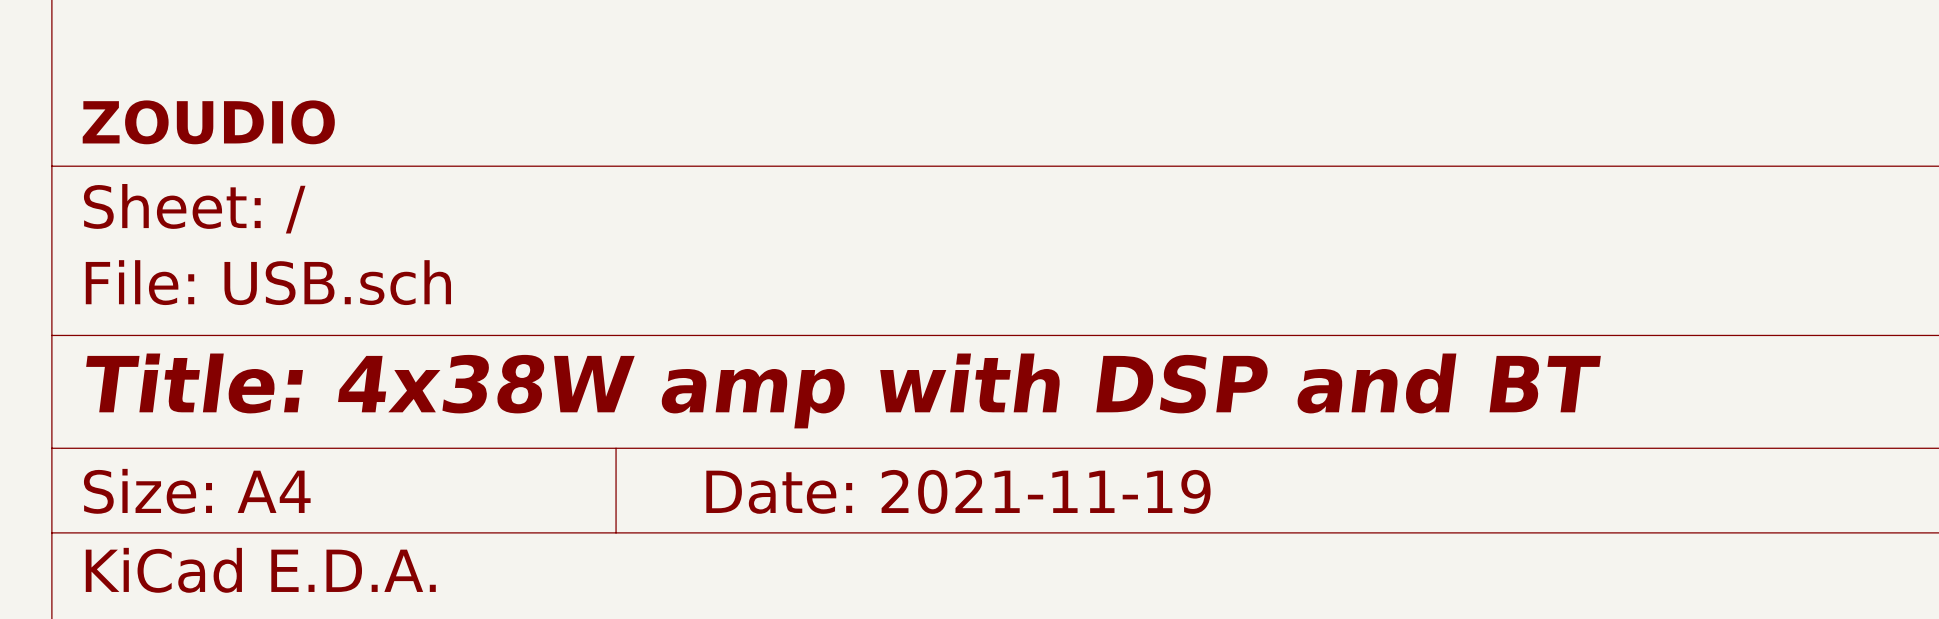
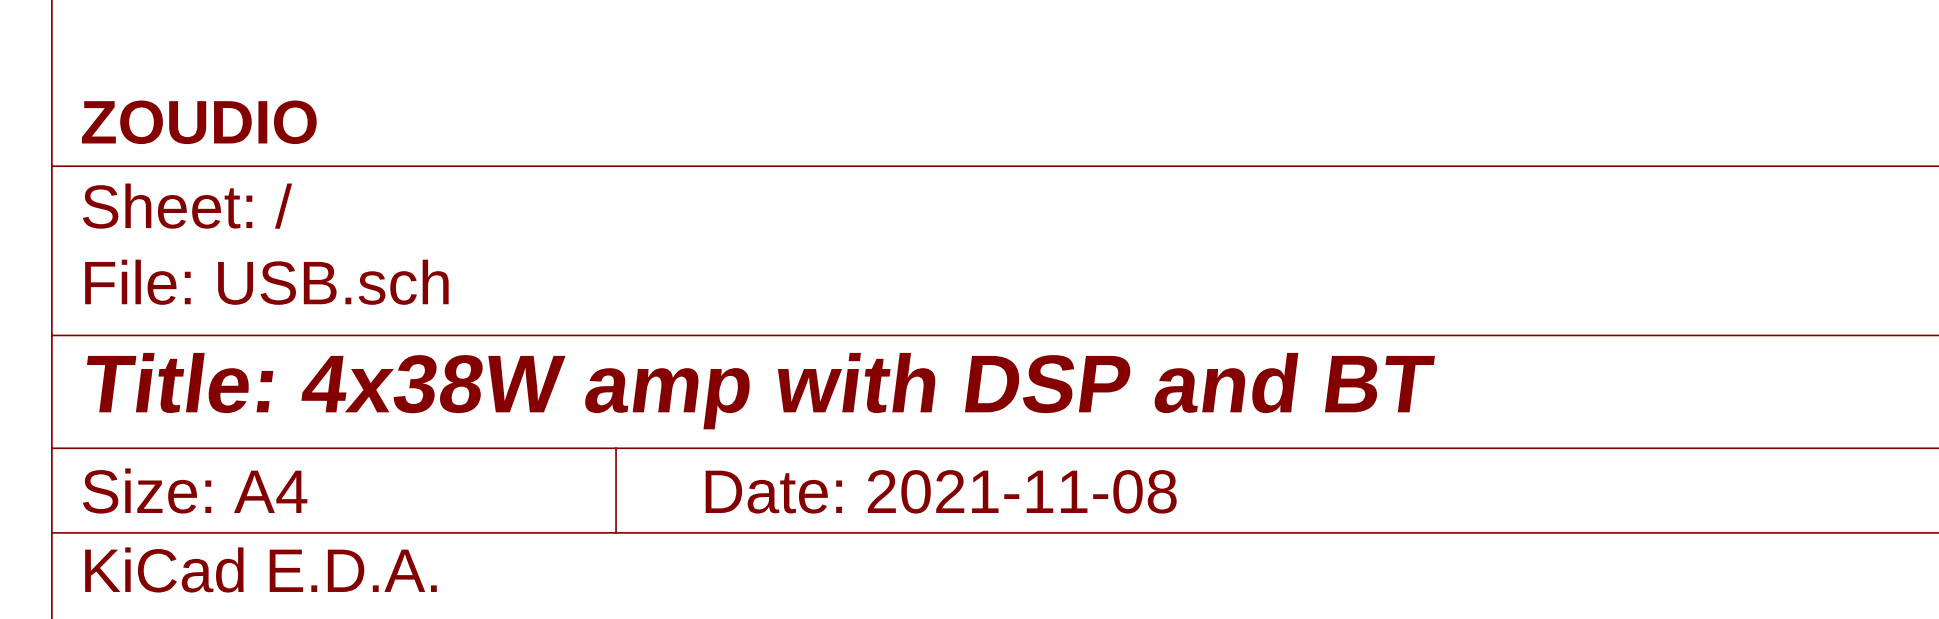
title block: Date: 2021-11-19 (958, 491) -> Date: 2021-11-08 (941, 491)

